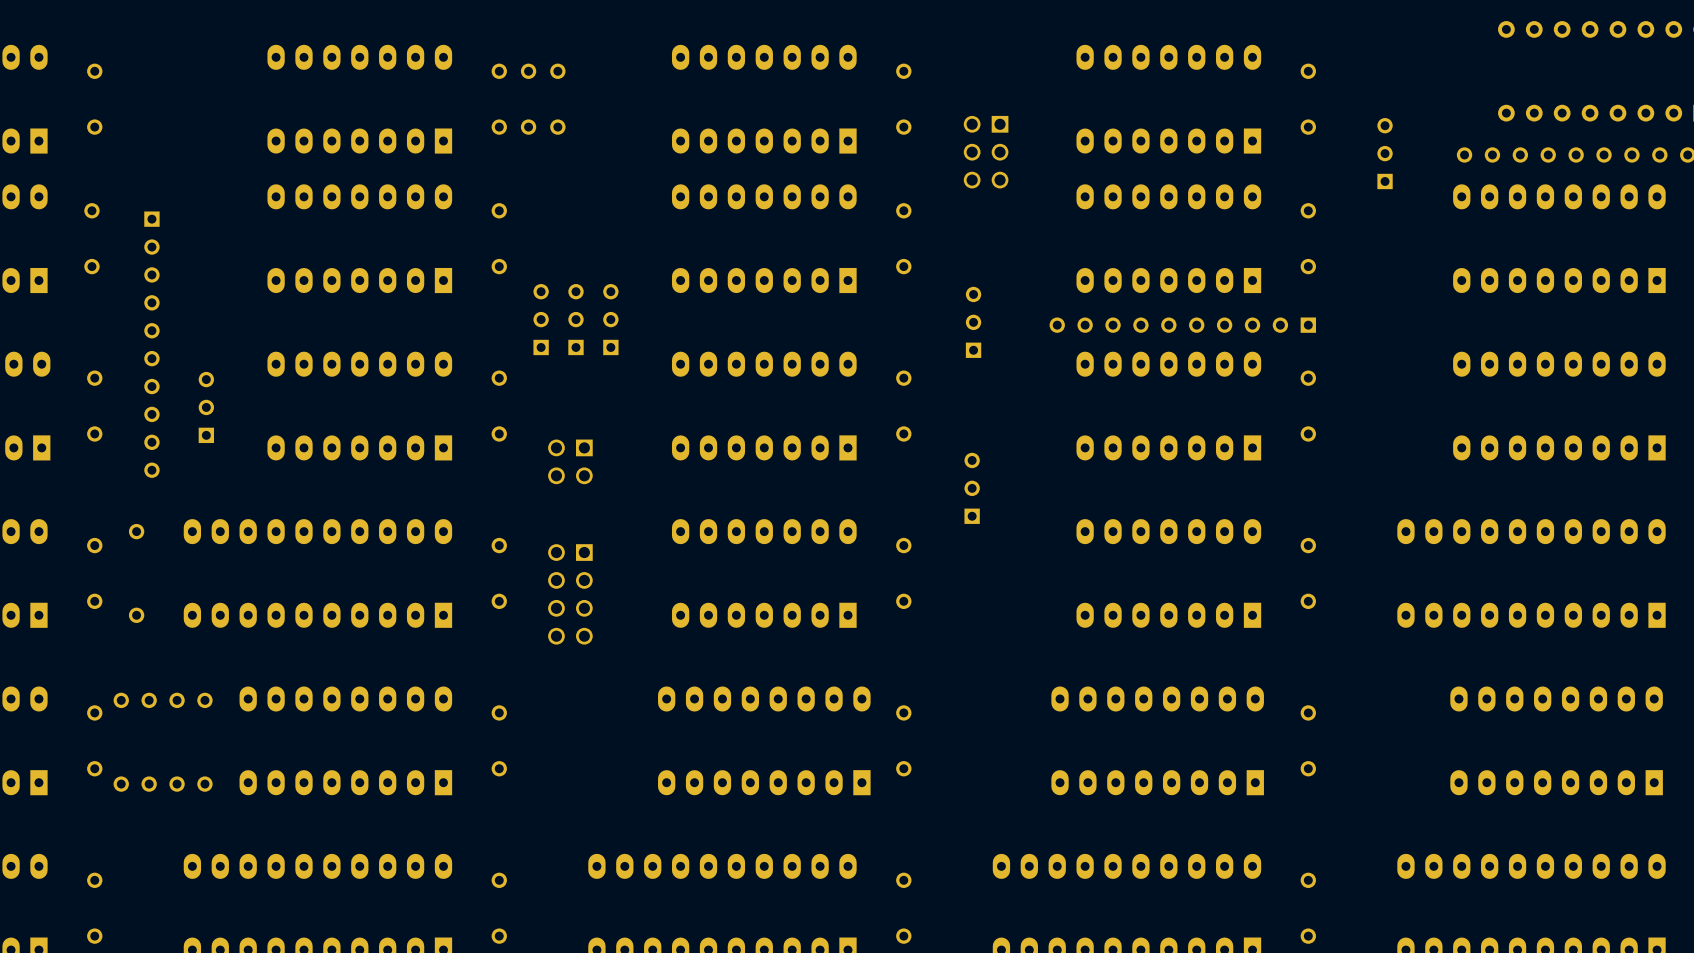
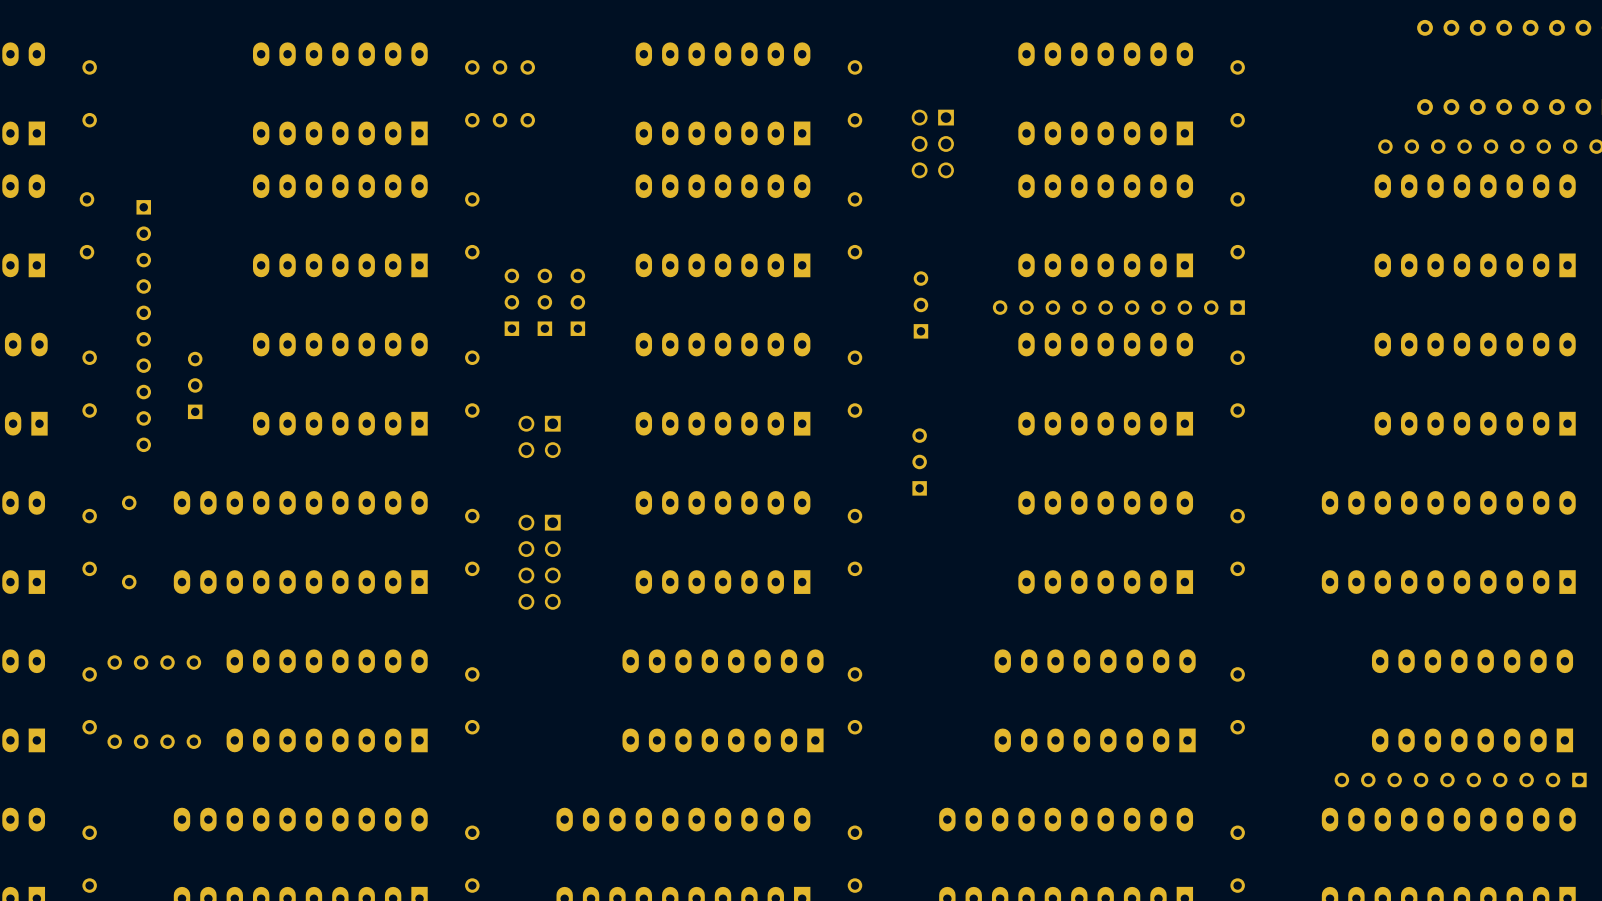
part: (1385, 153) -> none
part: none -> (1460, 779)

